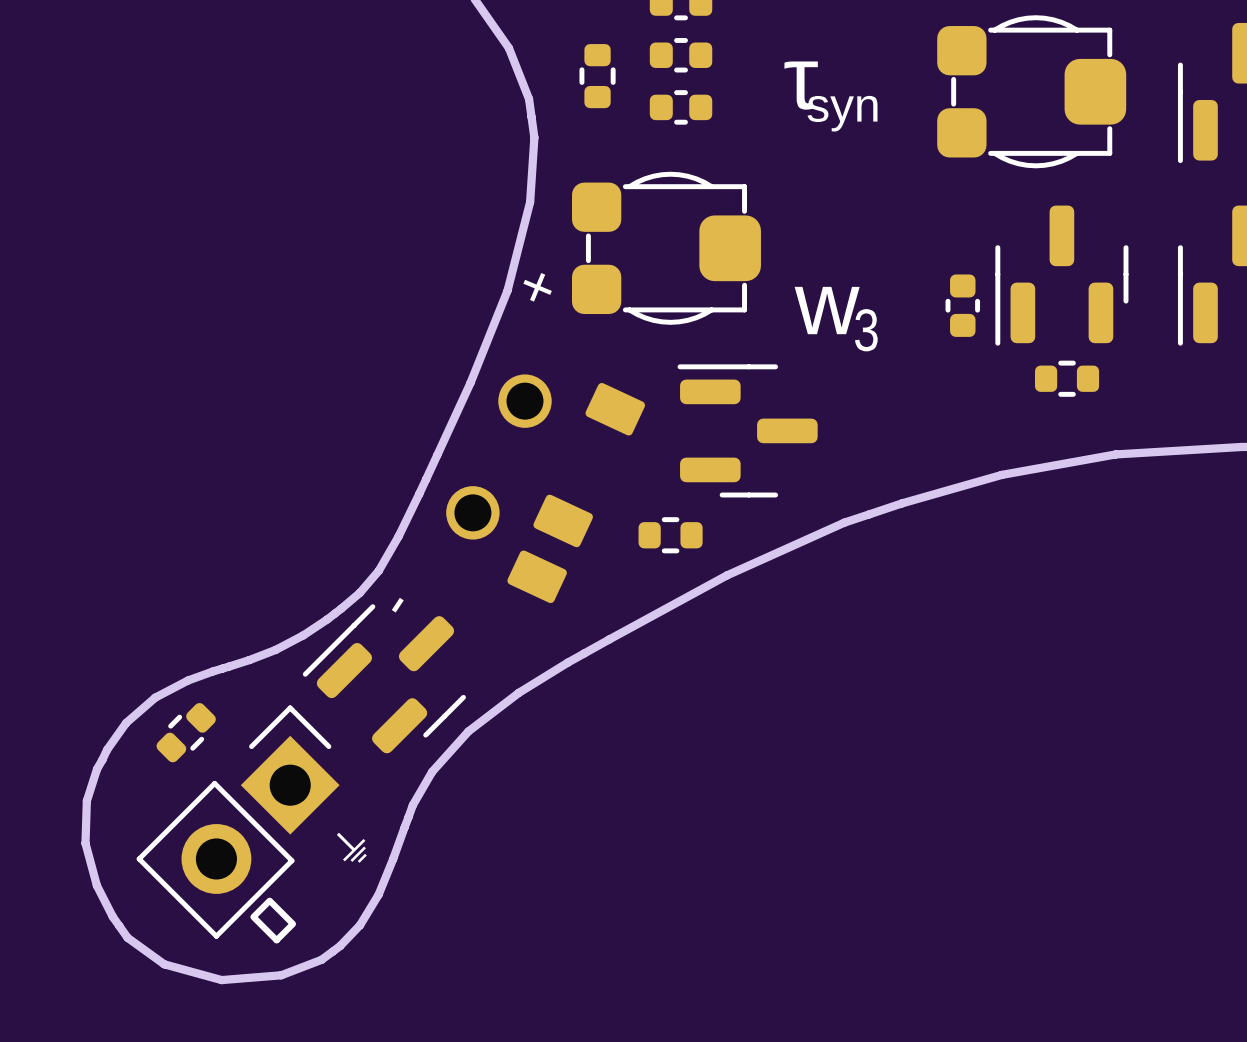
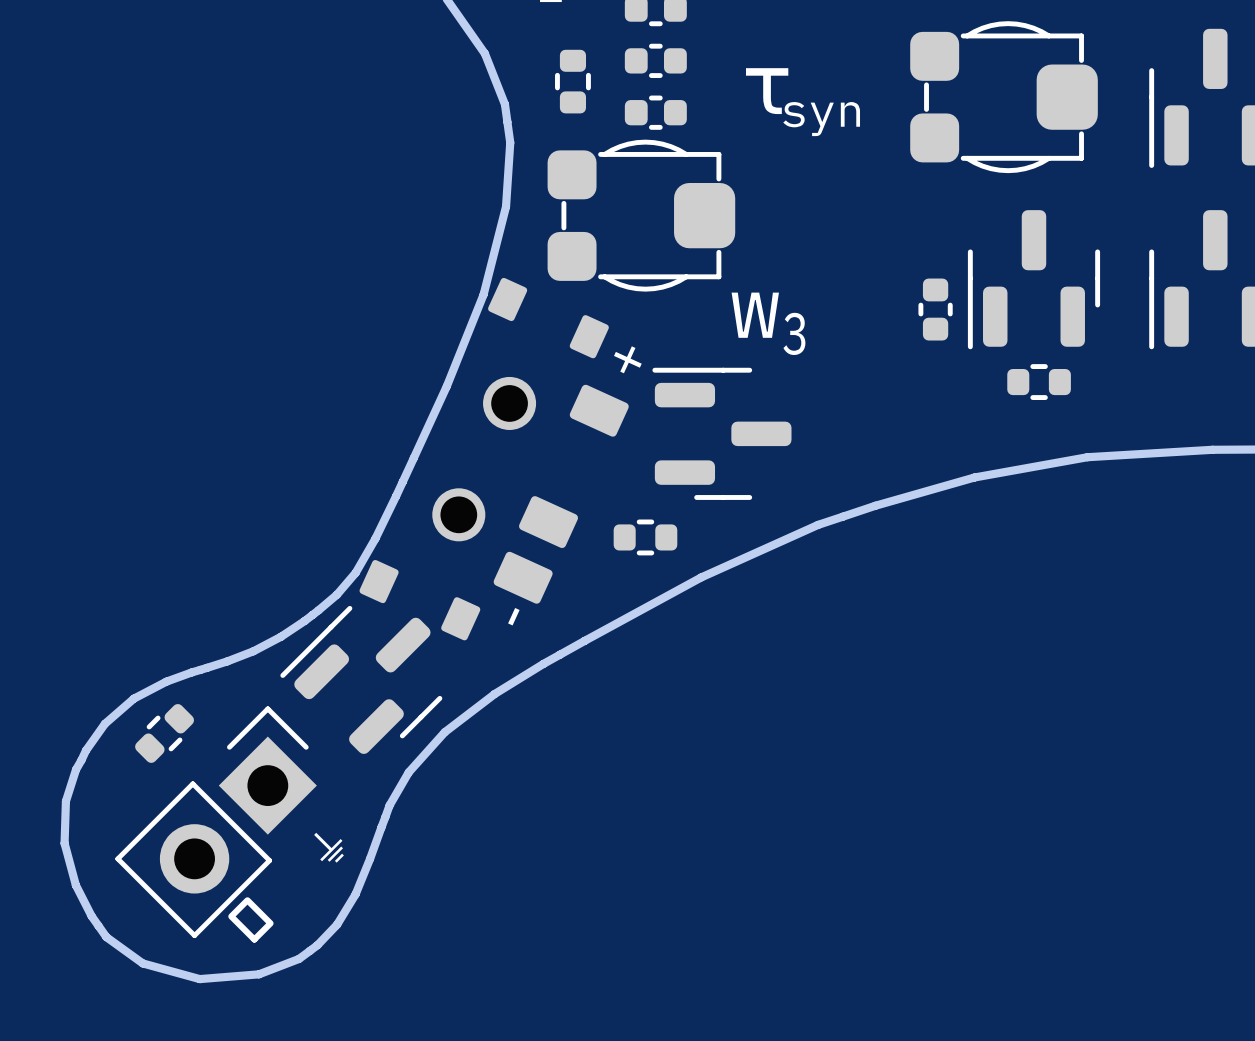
part position: (666, 248) -> (641, 215)
text rotation: 0° (537, 287) -> 91.9° clockwise (627, 359)
text position: + (537, 287) -> + (627, 359)
text position: w (827, 310) -> w (755, 315)
text position: 3 (866, 330) -> 3 (794, 333)
part: none -> (494, 459)
part: (545, 488) -> none
text rotation: 0° (397, 605) -> 171° clockwise (513, 616)
text position: - (397, 605) -> - (513, 616)

